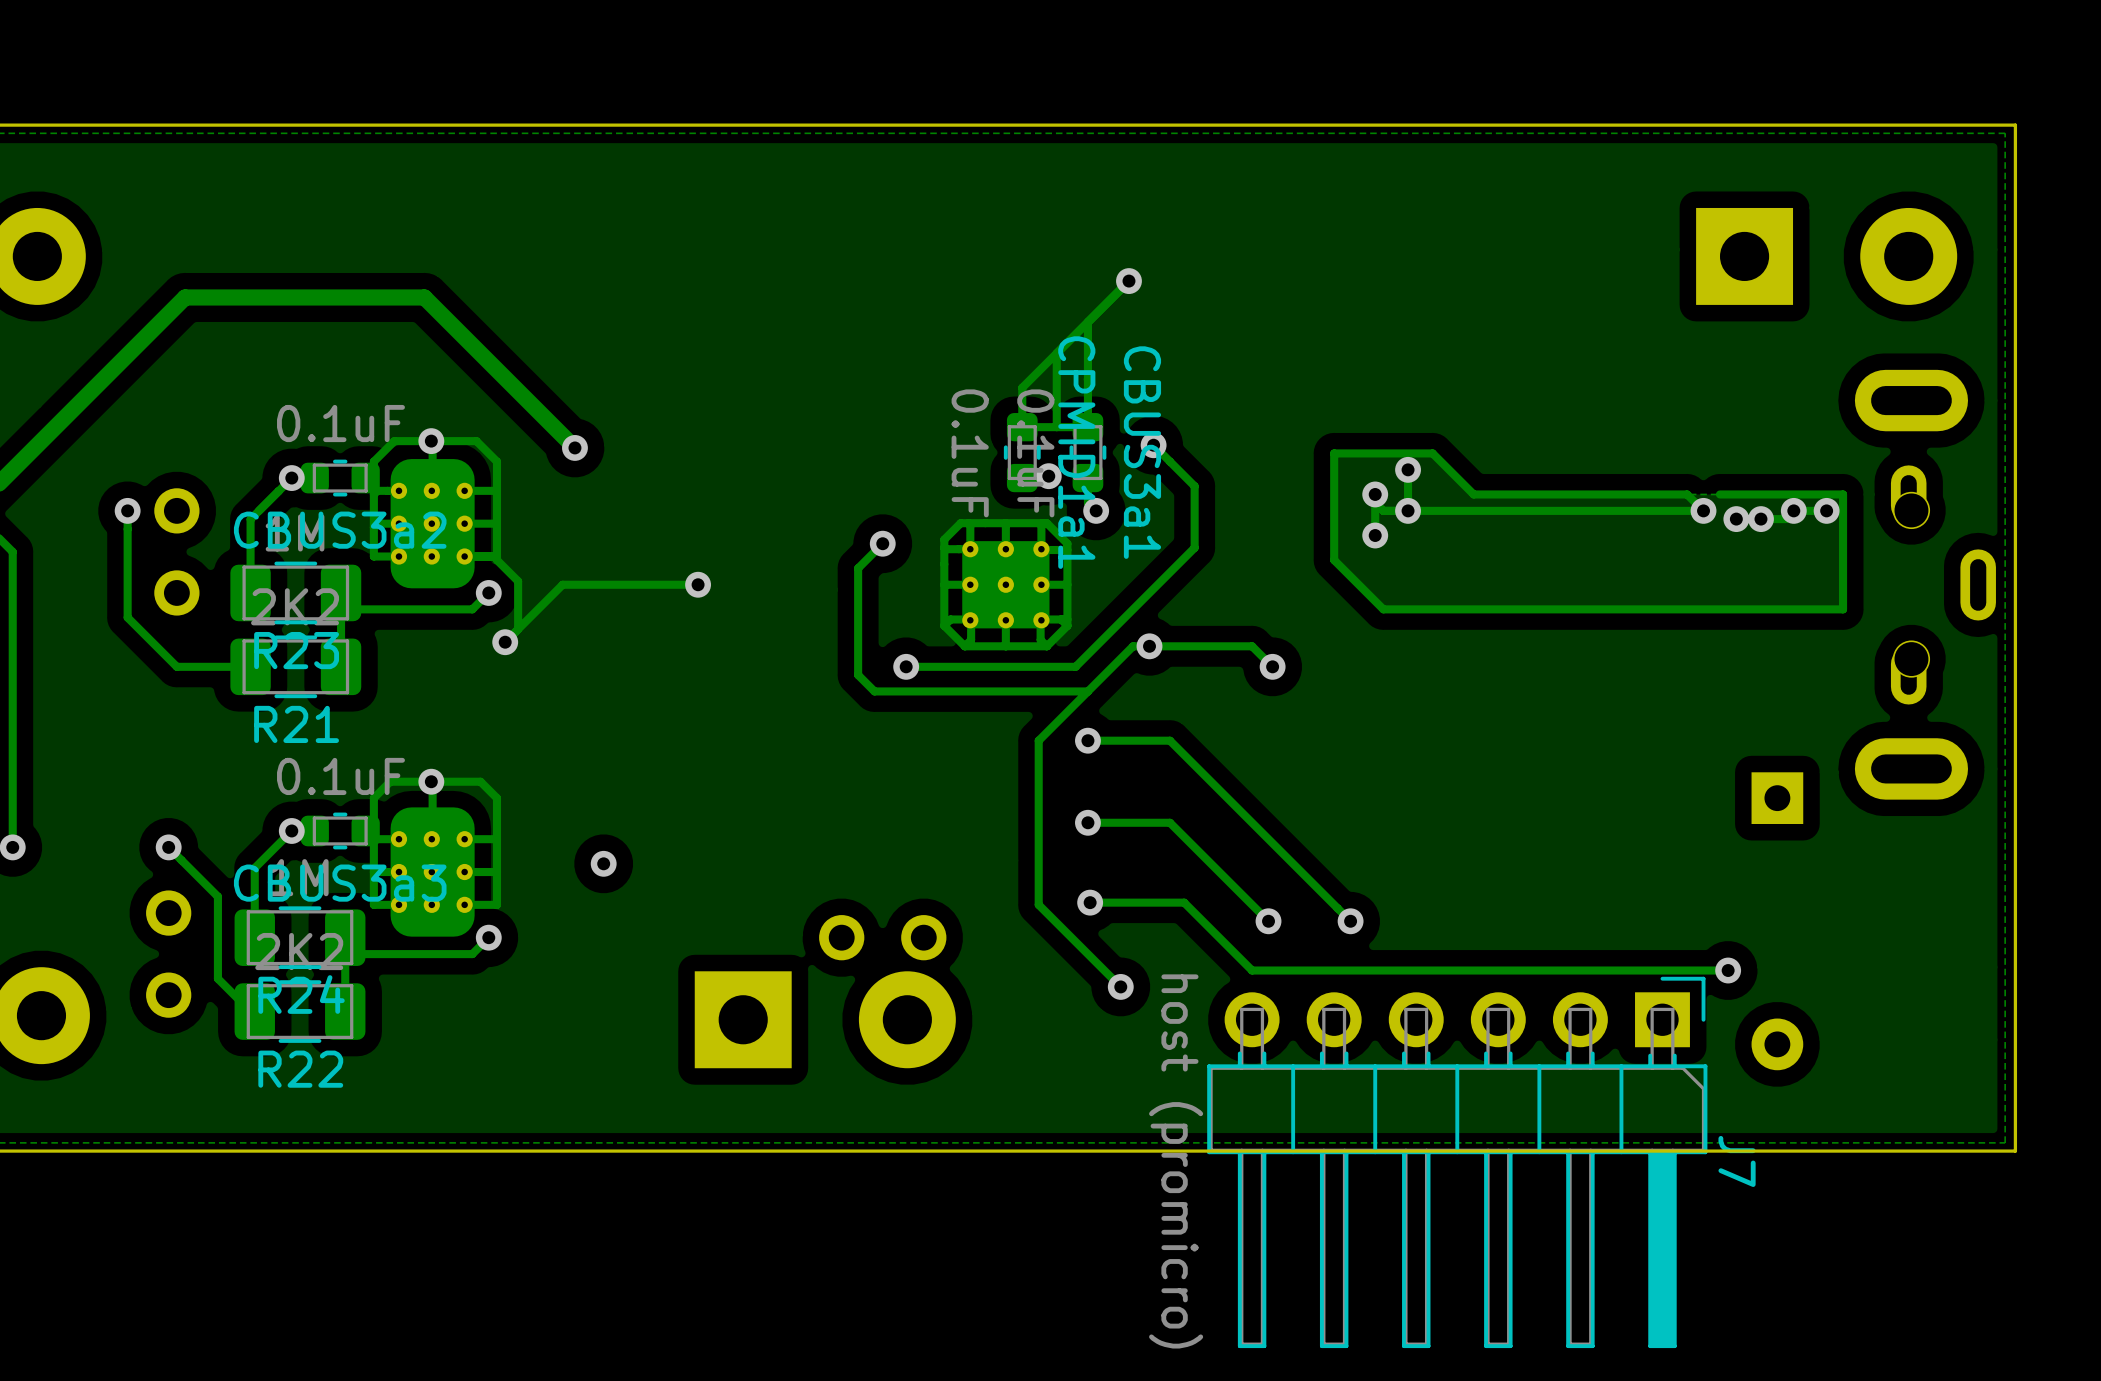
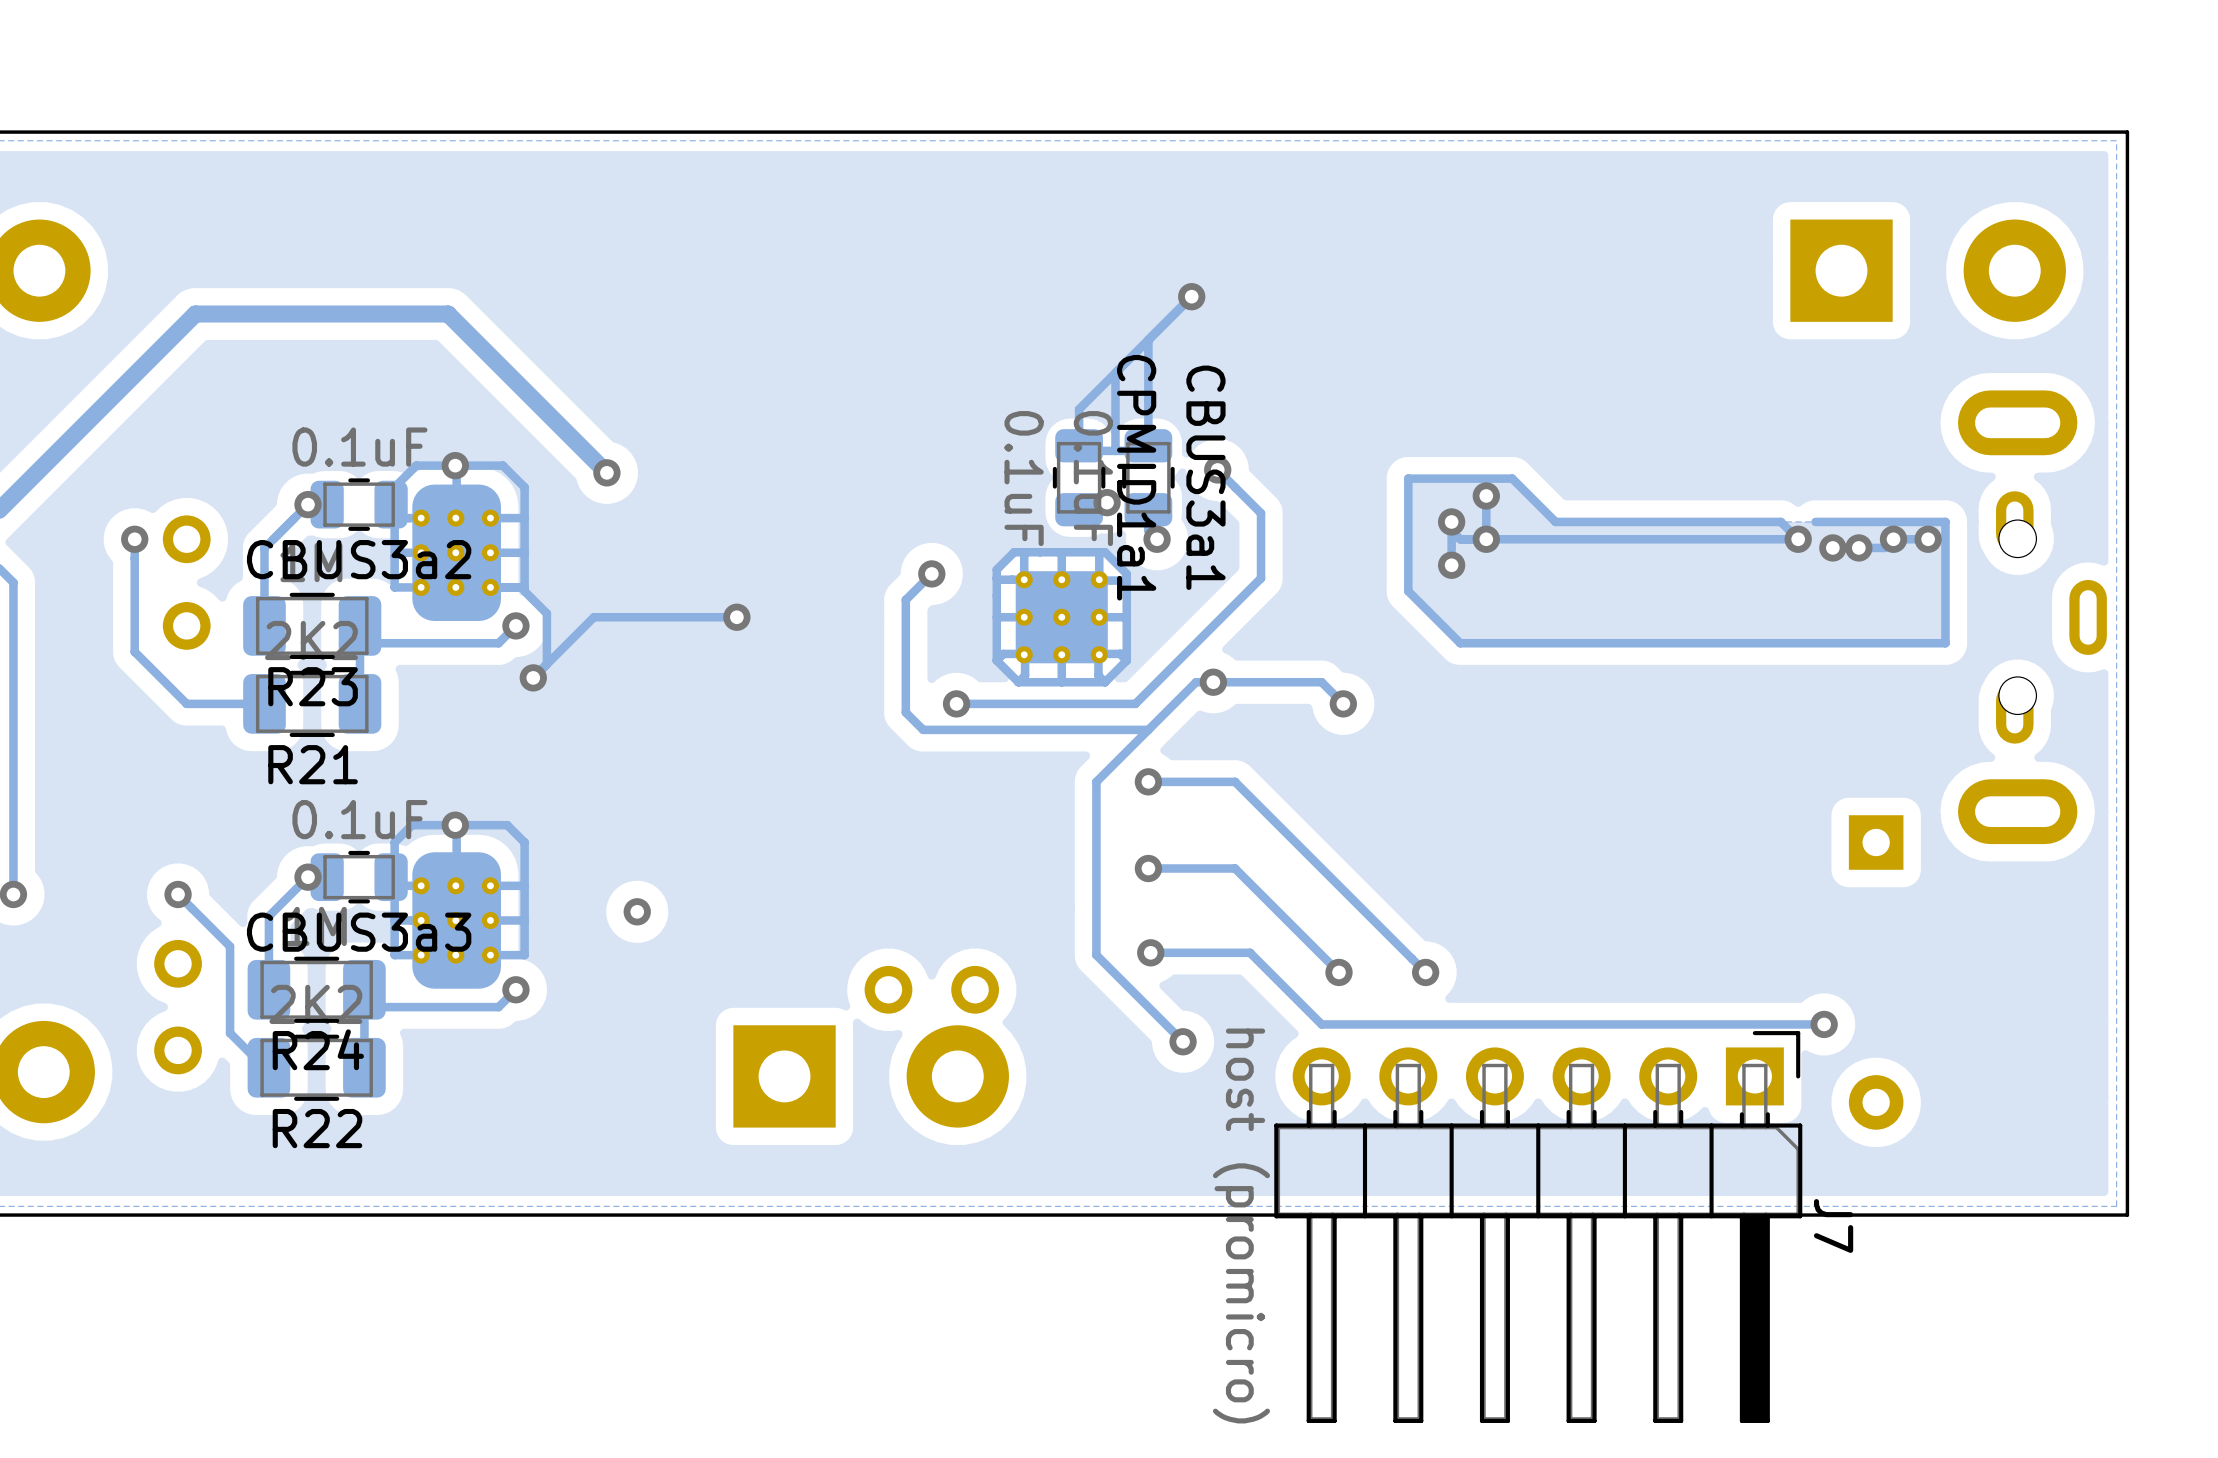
CPMID1a1 footprint: [1003, 413, 1041, 493] -> [1052, 429, 1106, 527]
CBUS3a1 footprint: [1069, 413, 1107, 493] -> [1122, 429, 1175, 527]
CBUS3a2 footprint: [300, 459, 380, 497] -> [310, 478, 408, 531]
CBUS3a3 footprint: [300, 812, 380, 850] -> [310, 850, 408, 904]

